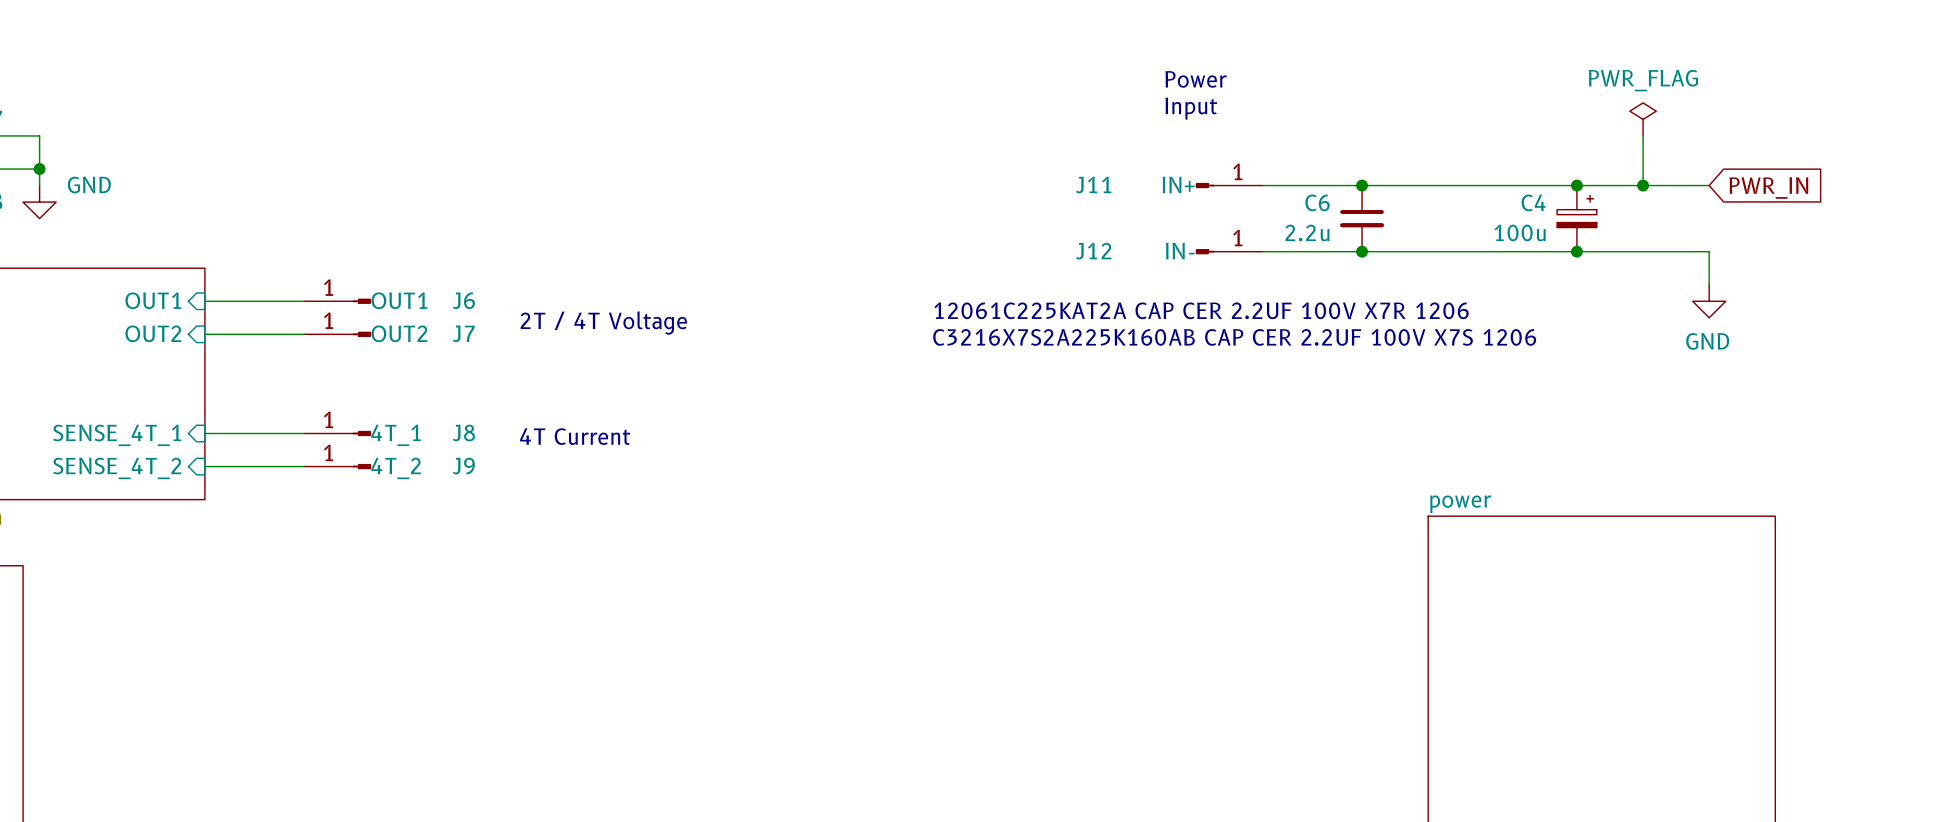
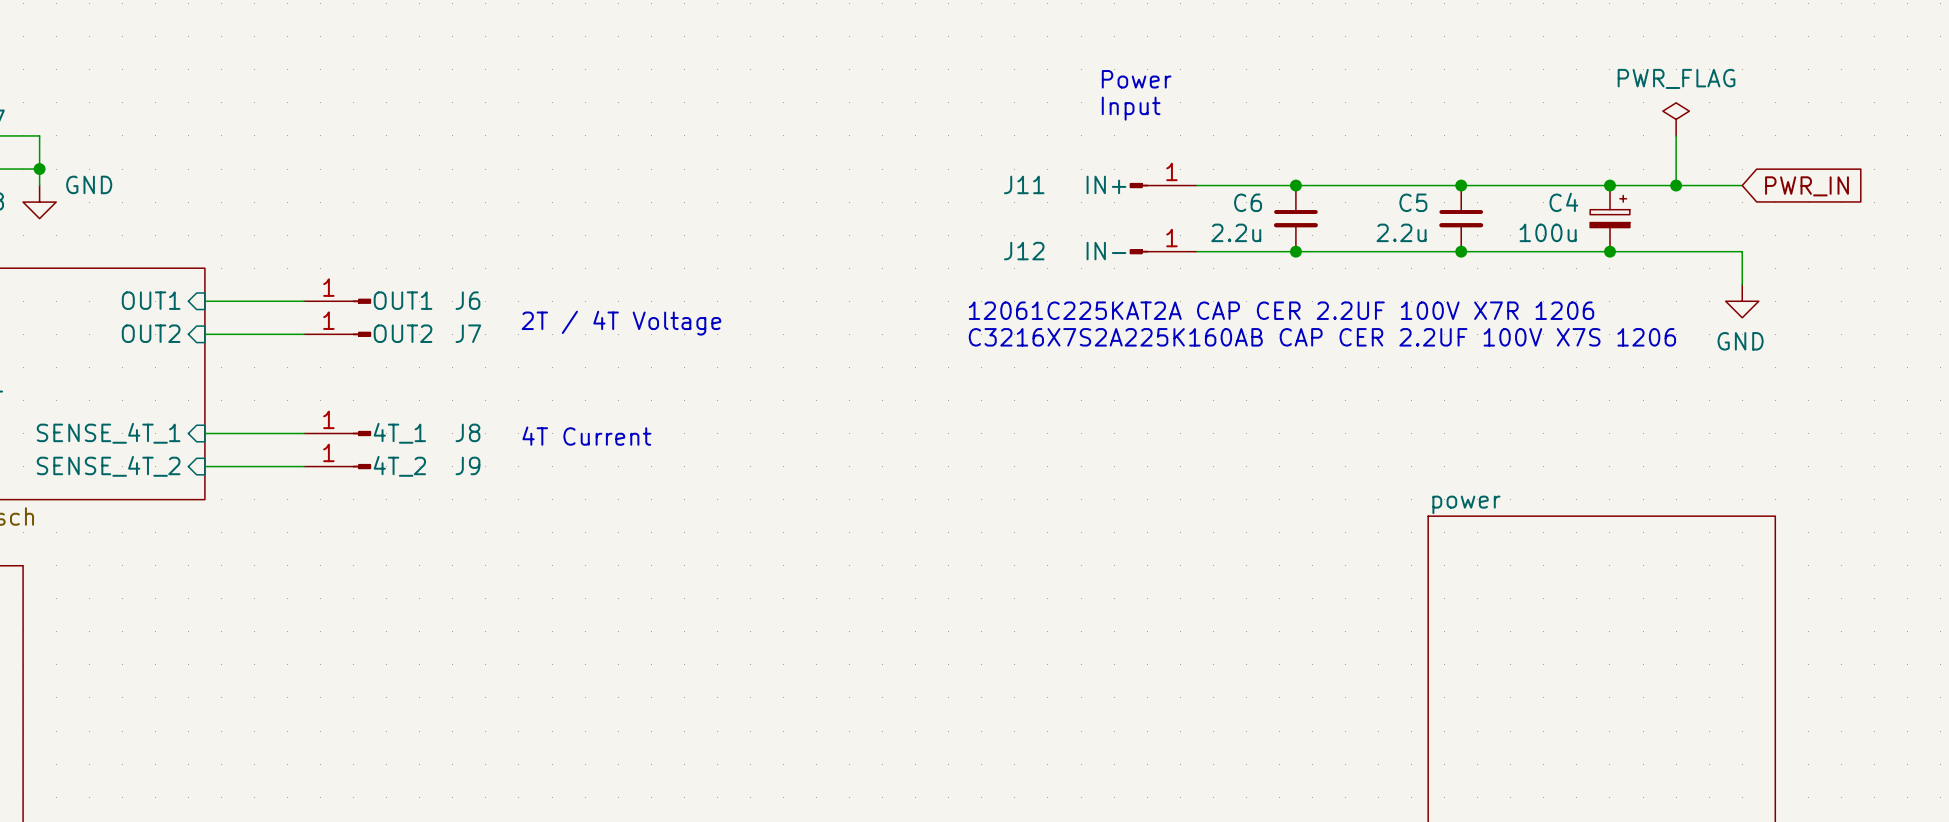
text position: Power (1196, 79) -> Power (1136, 79)
text position: Input (1191, 108) -> Input (1131, 108)
power symbol position: PWR_FLAG (1643, 119) -> PWR_FLAG (1676, 119)
wire: (1643, 135) (1643, 185) -> (1676, 135) (1676, 185)
J11 position: (1229, 185) -> (1163, 185)
junction: none -> (1295, 185)
junction: (1362, 185) -> none
junction: none -> (1461, 185)
junction: (1576, 185) -> none
junction: none -> (1609, 185)
junction: (1643, 185) -> none
junction: none -> (1676, 185)
wire: none -> (1709, 185) (1742, 185)
global label position: PWR_IN (1768, 188) -> PWR_IN (1807, 186)
C6 position: (1362, 218) -> (1295, 218)
C5: none -> 2.2u (1461, 218)
C4 position: (1576, 218) -> (1609, 218)
J12 position: (1229, 251) -> (1163, 251)
junction: none -> (1295, 251)
junction: (1362, 251) -> none
junction: none -> (1461, 251)
junction position: (1576, 251) -> (1609, 251)
wire: (1709, 251) (1709, 284) -> (1709, 251) (1742, 251) (1742, 284)
power symbol position: GND (1709, 301) -> GND (1742, 301)
text position: 12061C225KAT2A CAP CER 2.2UF 100V X7R 1206 (1201, 310) -> 12061C225KAT2A CAP CER 2.2UF 100V X7R 1206 (1281, 310)
text position: C3216X7S2A225K160AB CAP CER 2.2UF 100V X7S 1206 (1234, 337) -> C3216X7S2A225K160AB CAP CER 2.2UF 100V X7S 1206 (1322, 337)

